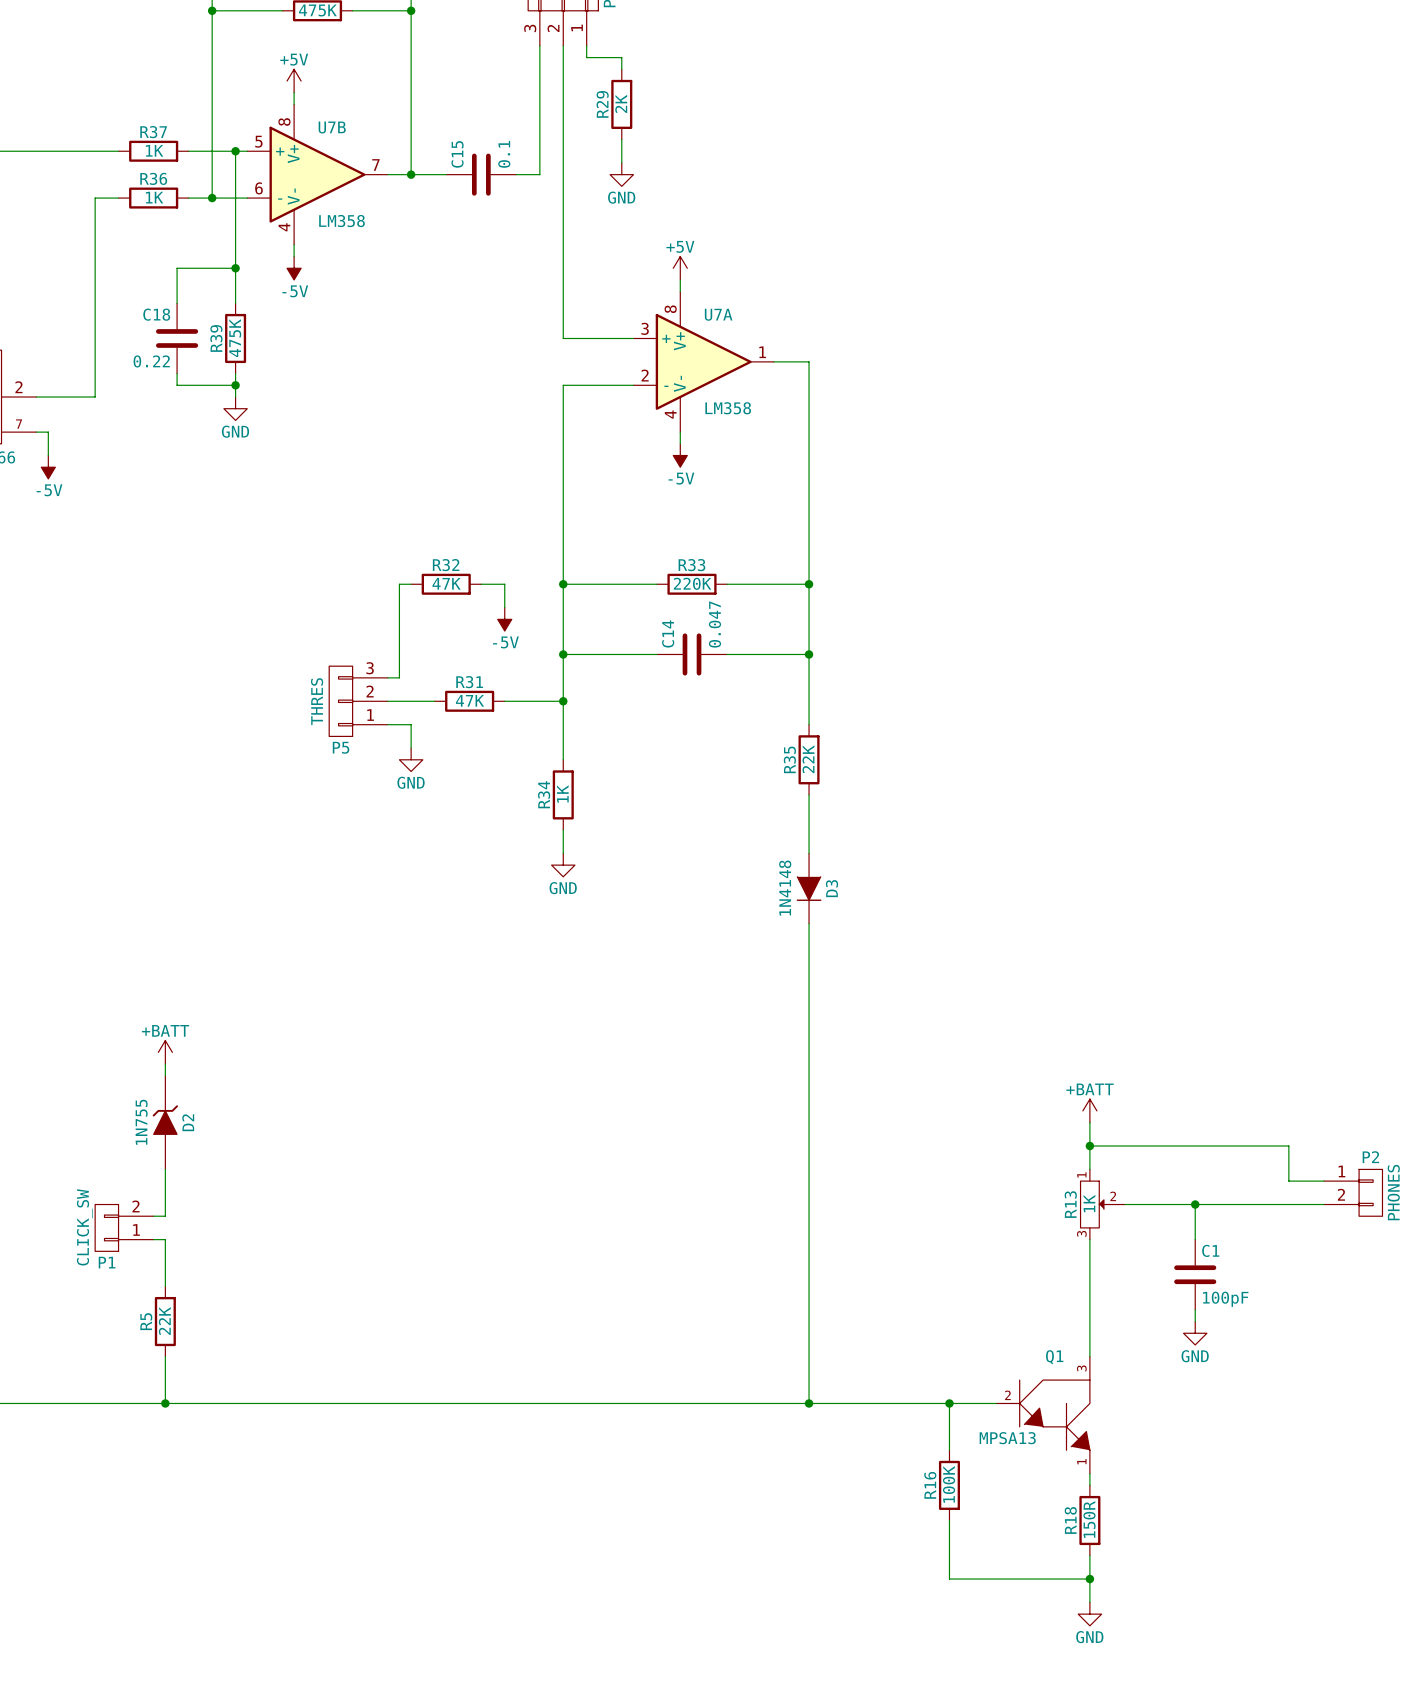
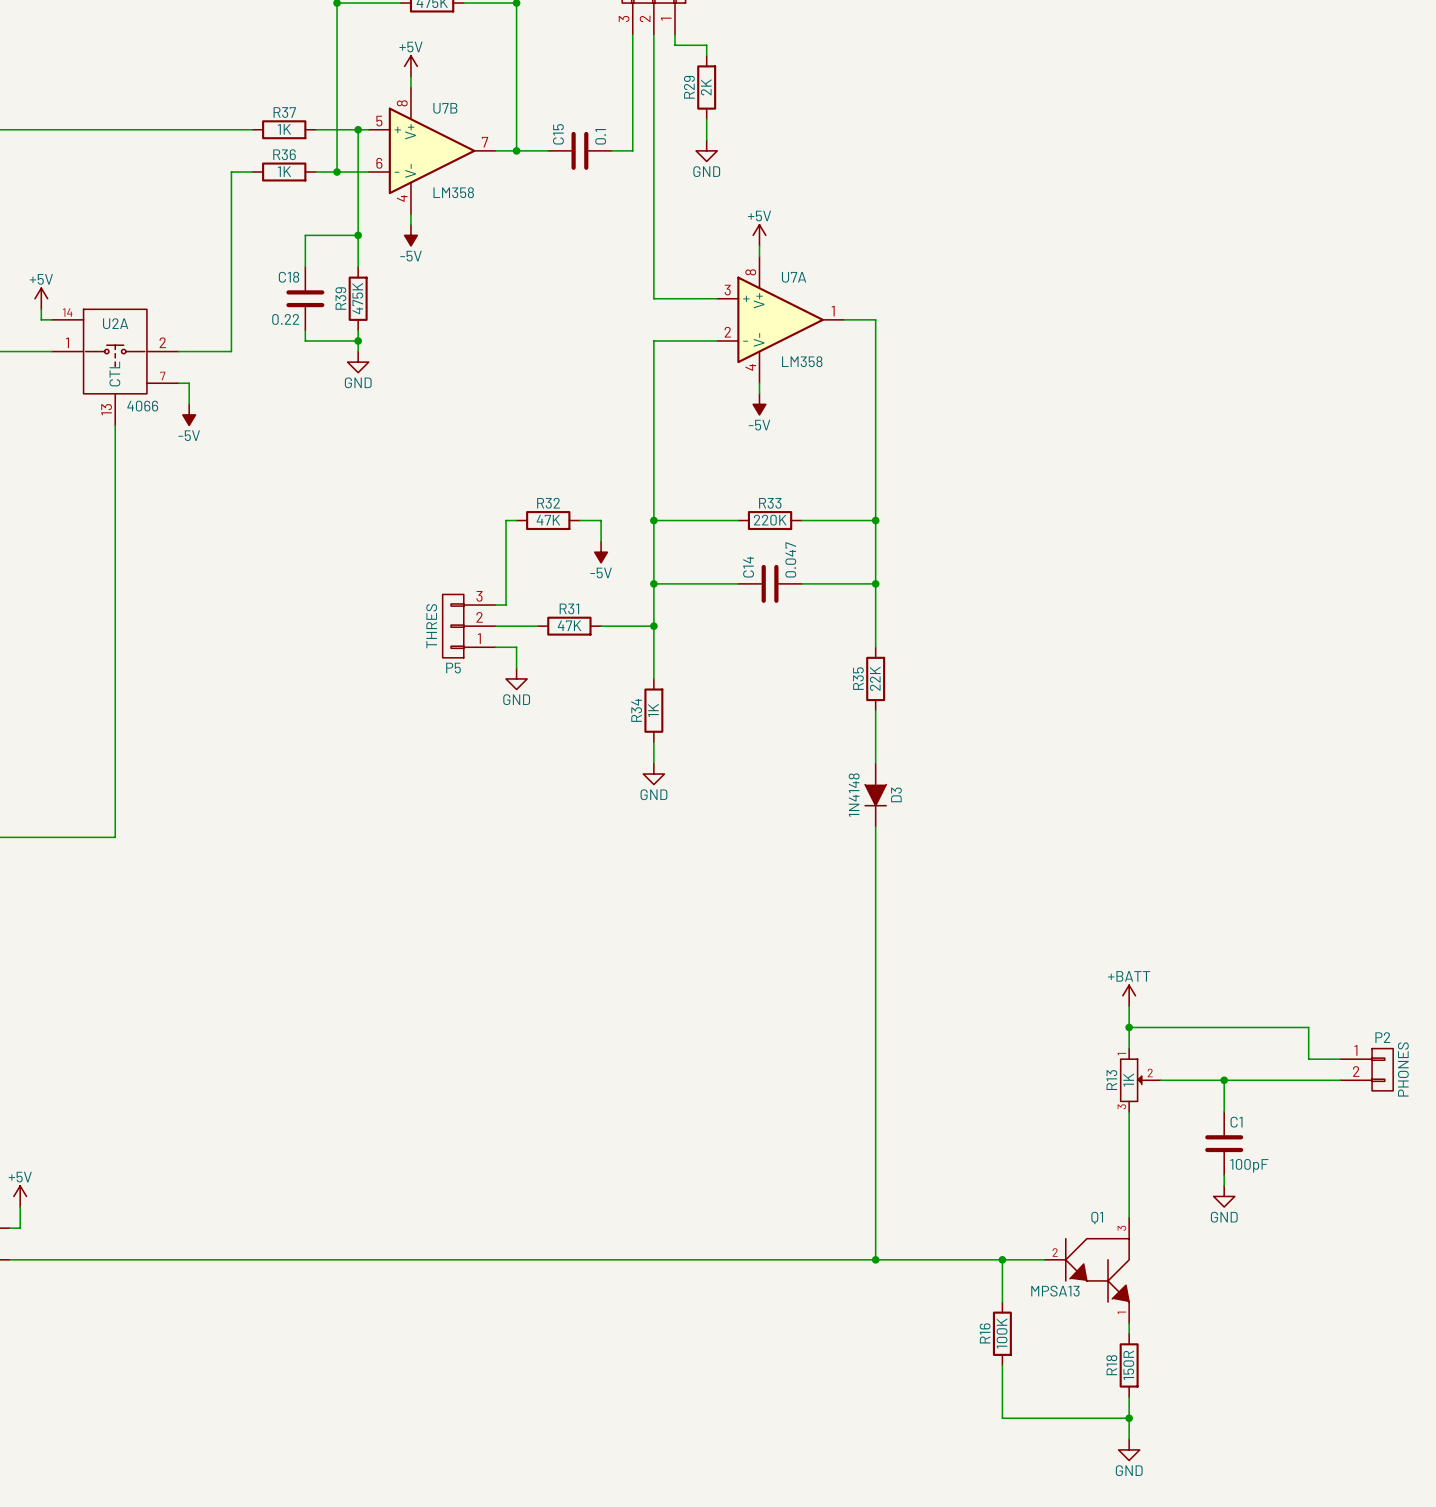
power symbol: +BATT (165, 1052) -> none
wire: (165, 1064) (165, 1075) -> none
D2: 1N755 (165, 1122) -> none
wire: (165, 1169) (165, 1216) (153, 1216) -> none
P1: CLICK_SW (124, 1227) -> none
wire: (153, 1239) (165, 1239) (165, 1286) -> none
R5: 22K (165, 1321) -> none
wire: (165, 1356) (165, 1403) -> none
junction: (165, 1403) -> none

